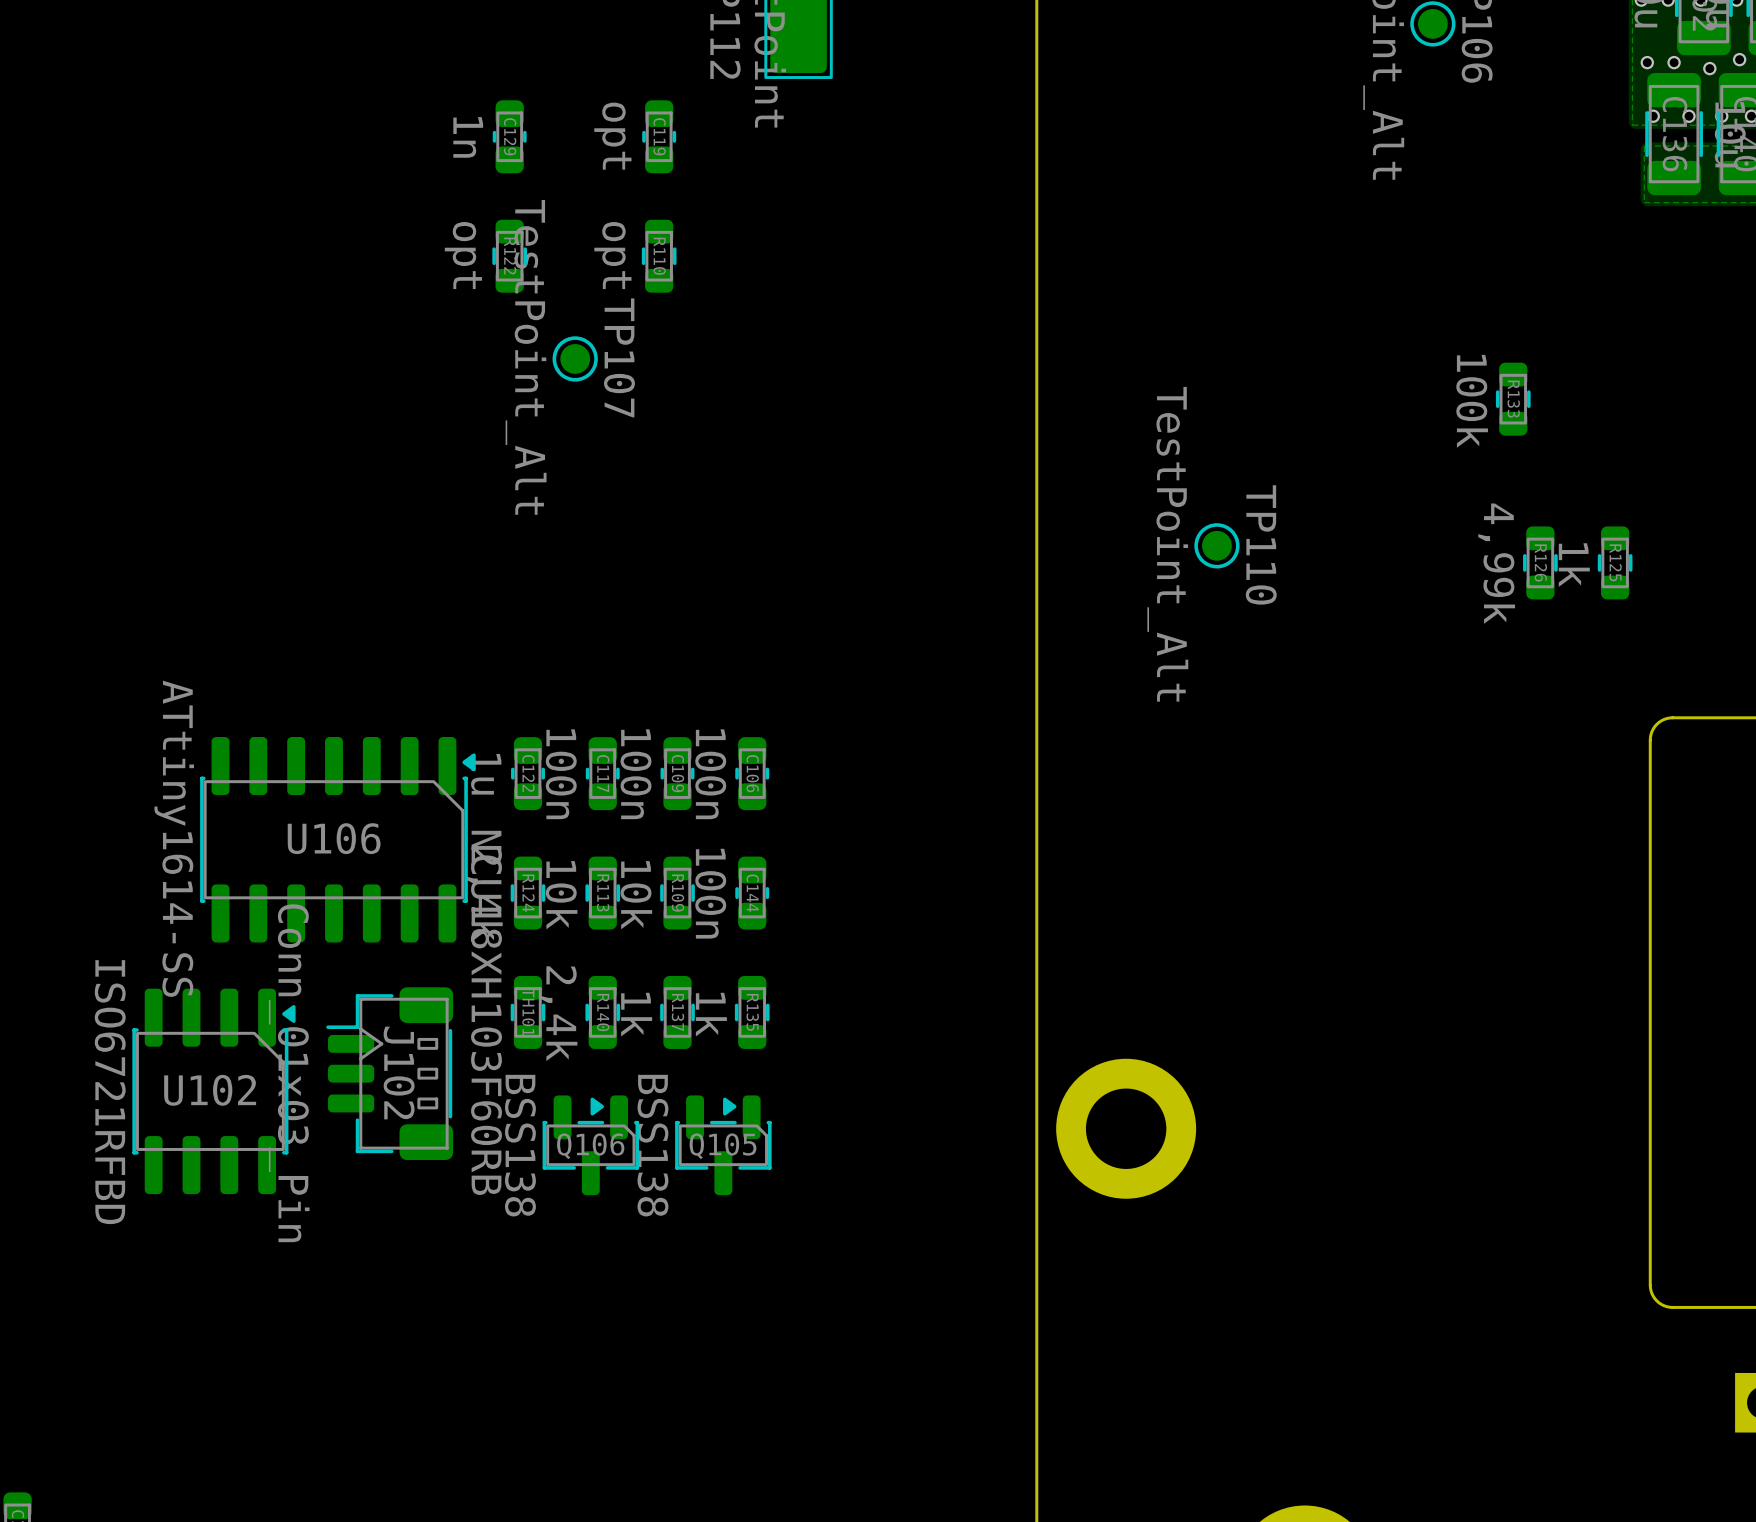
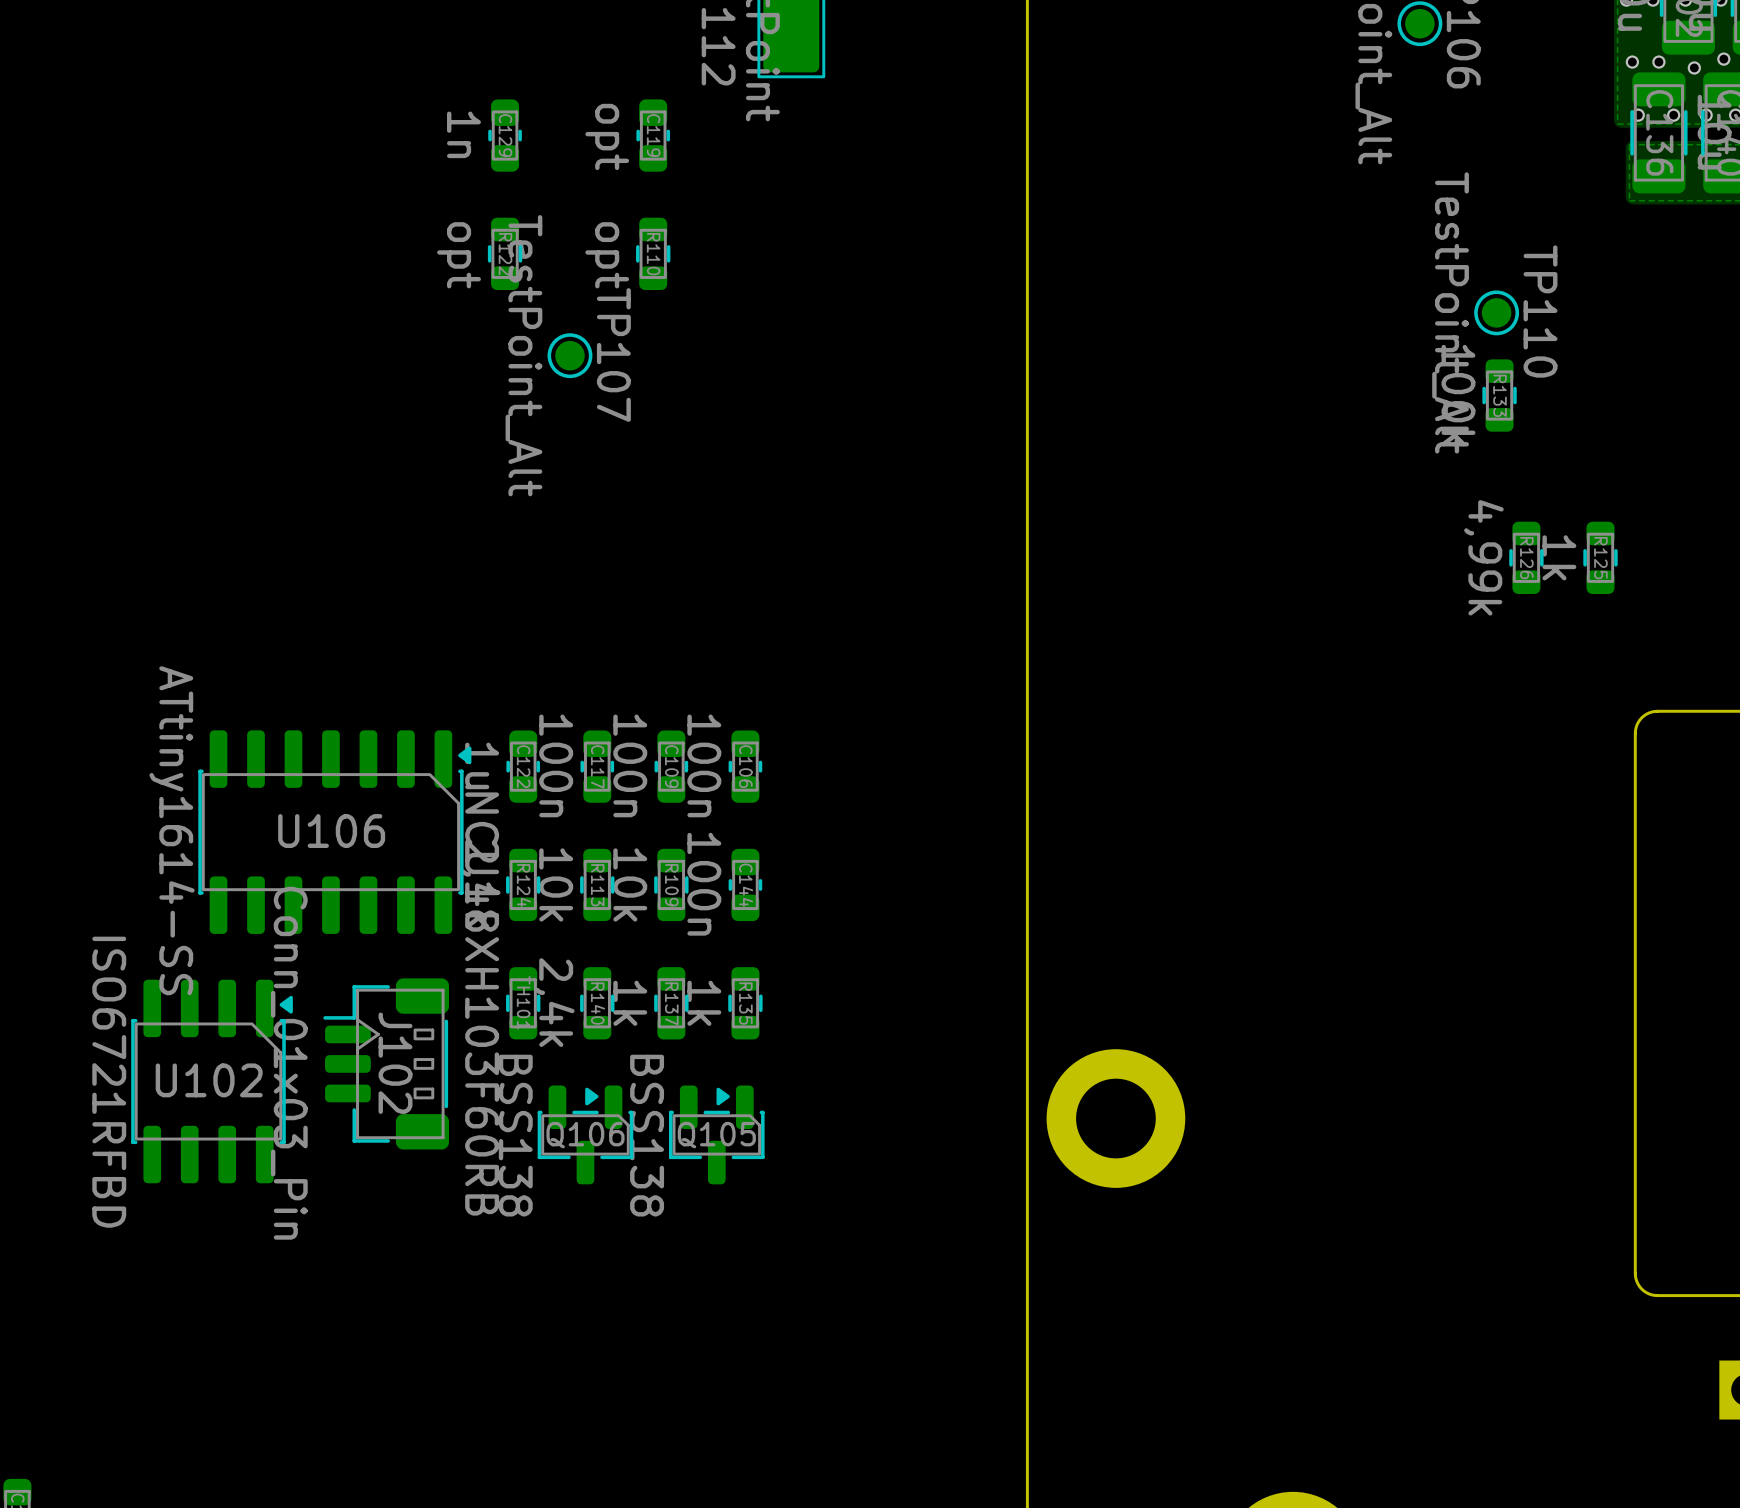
TP110 position: (1216, 545) -> (1496, 312)

